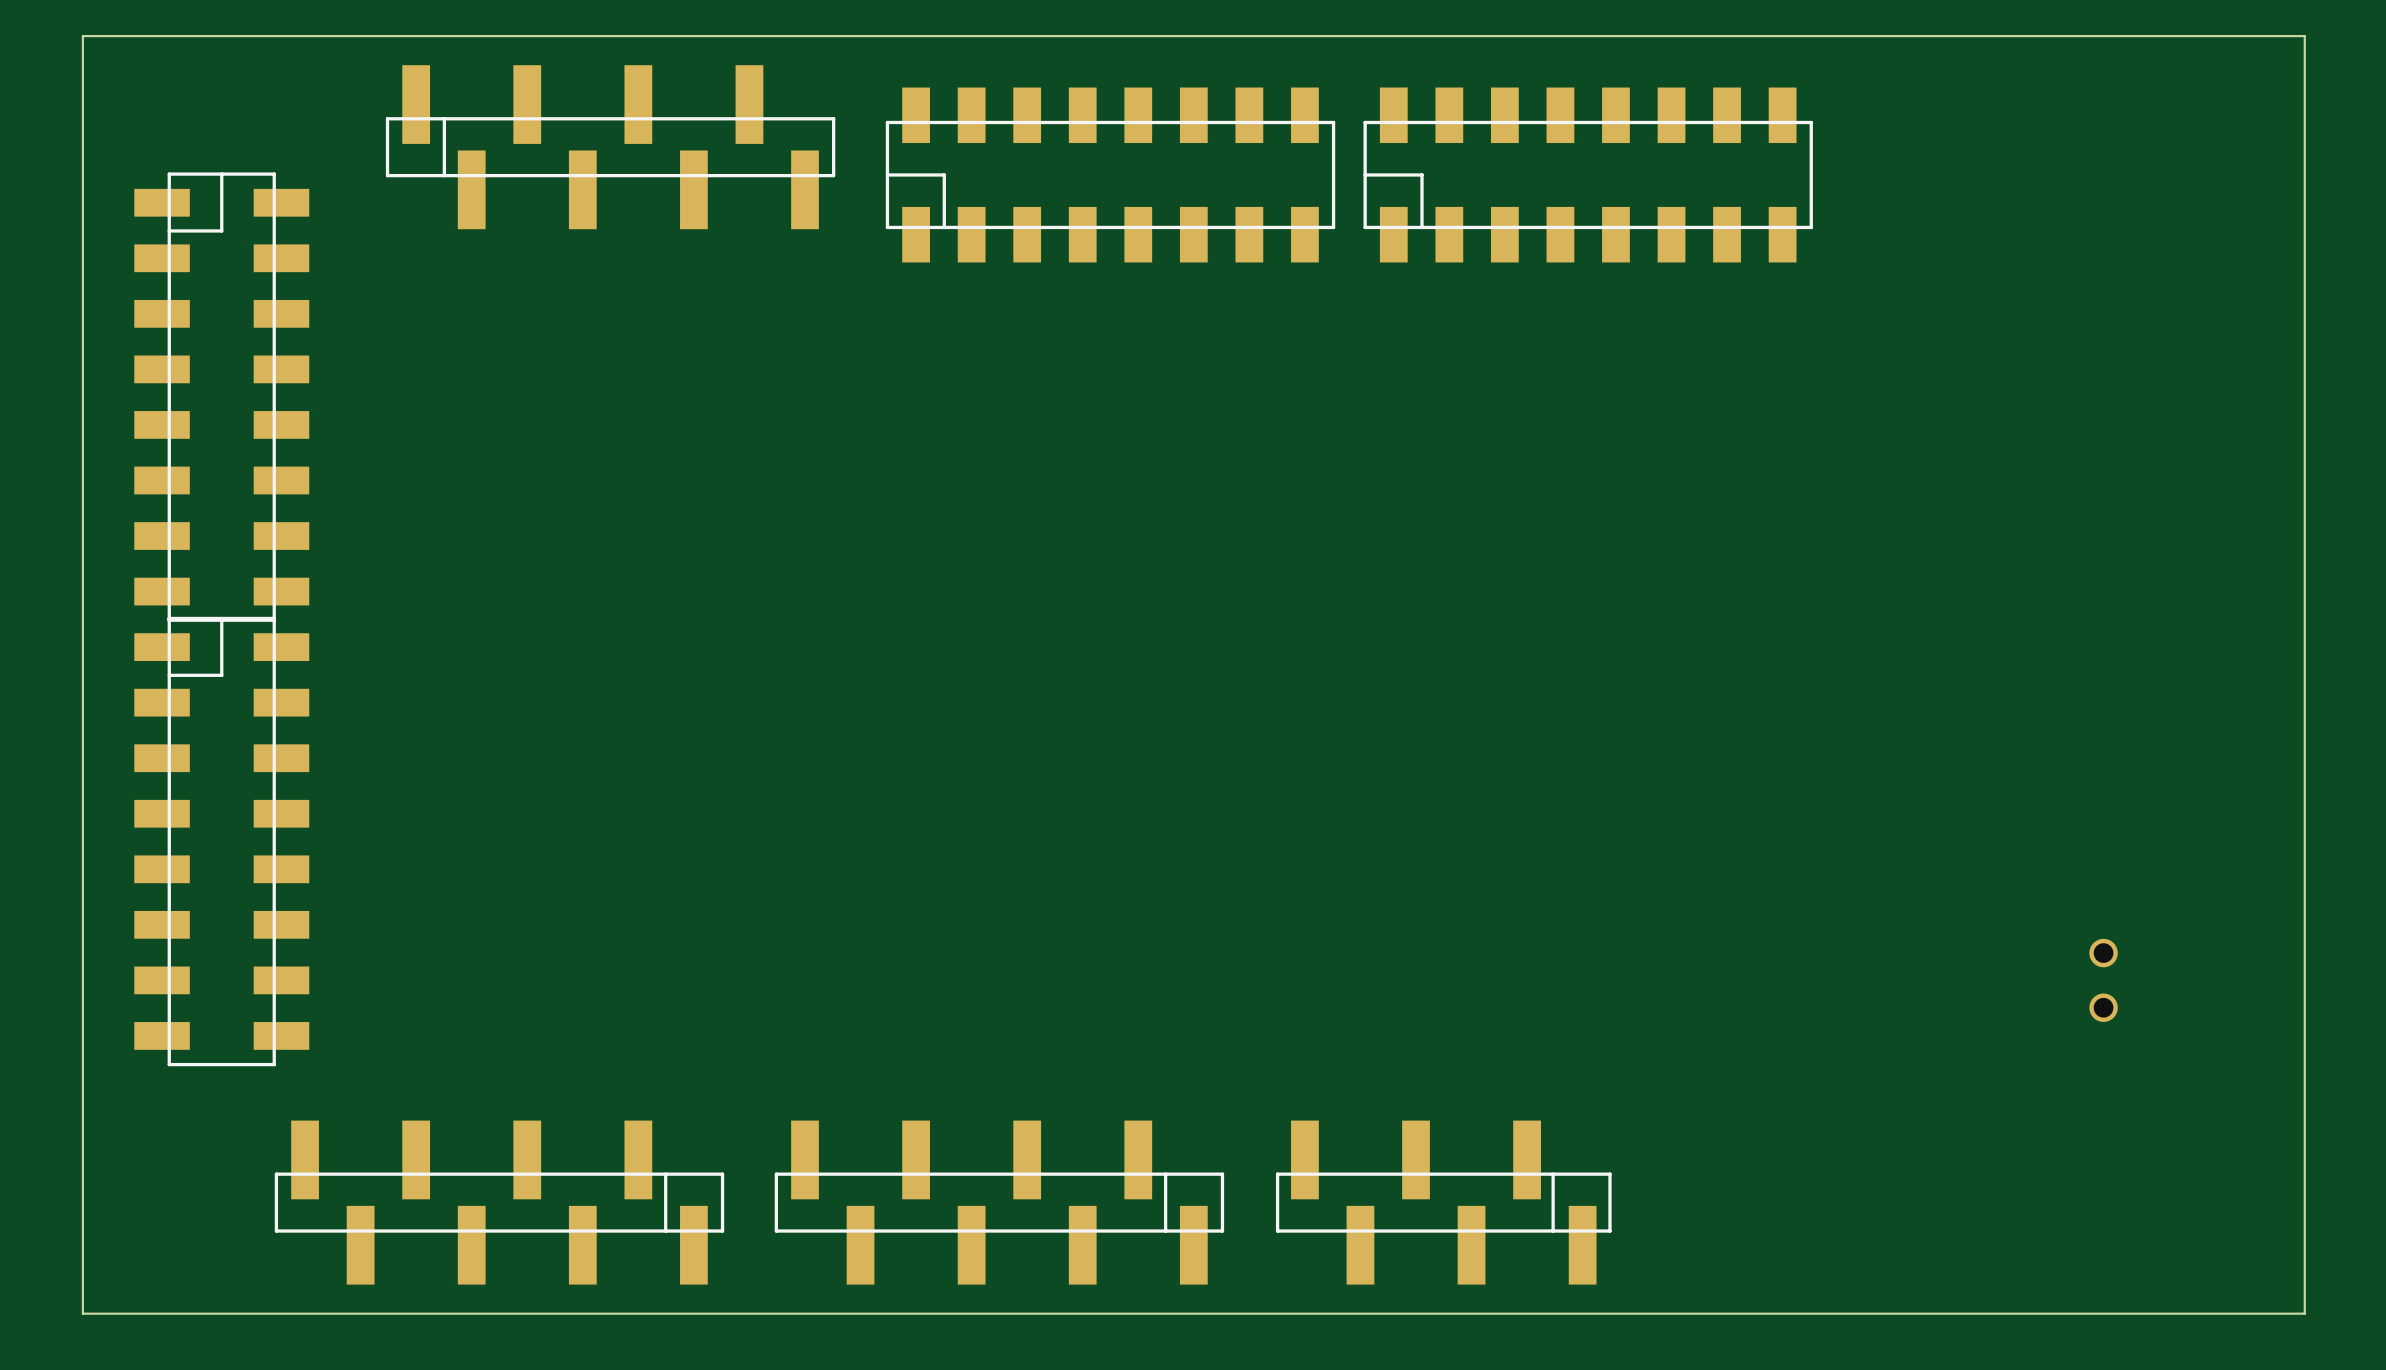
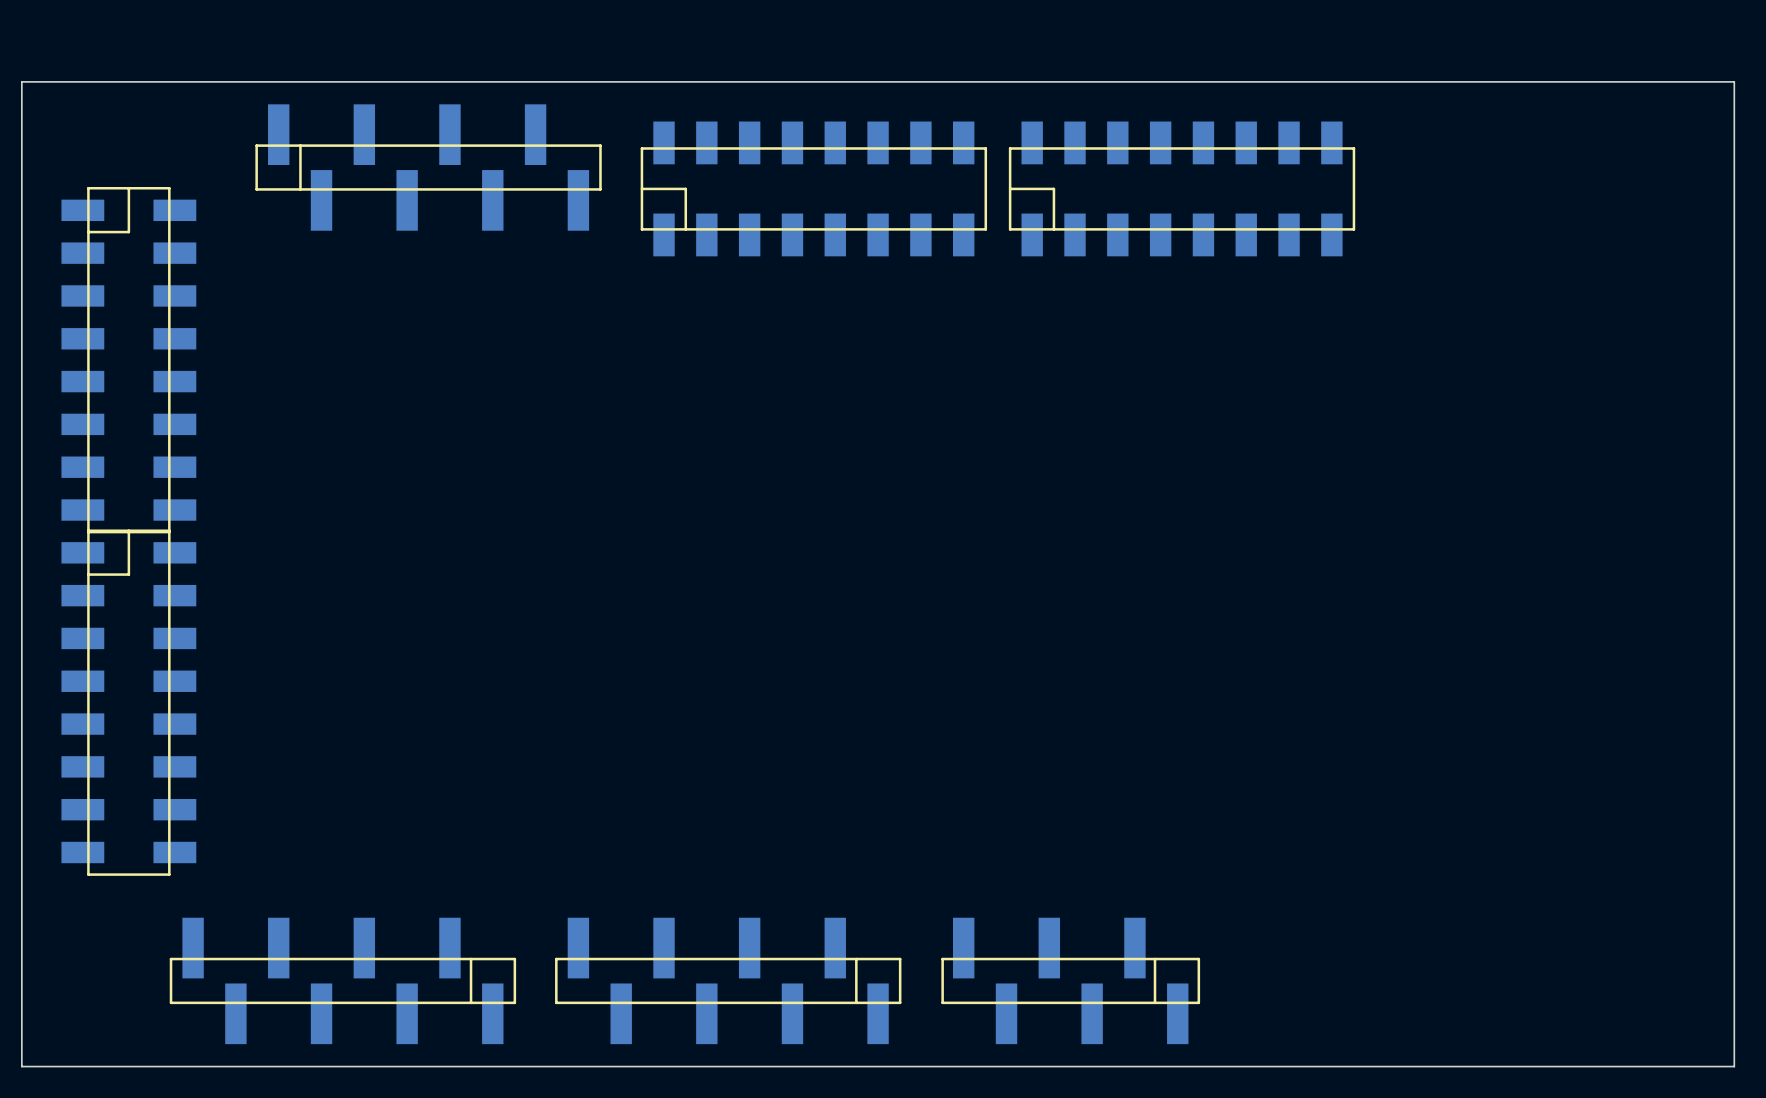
part: (2103, 980) -> none

